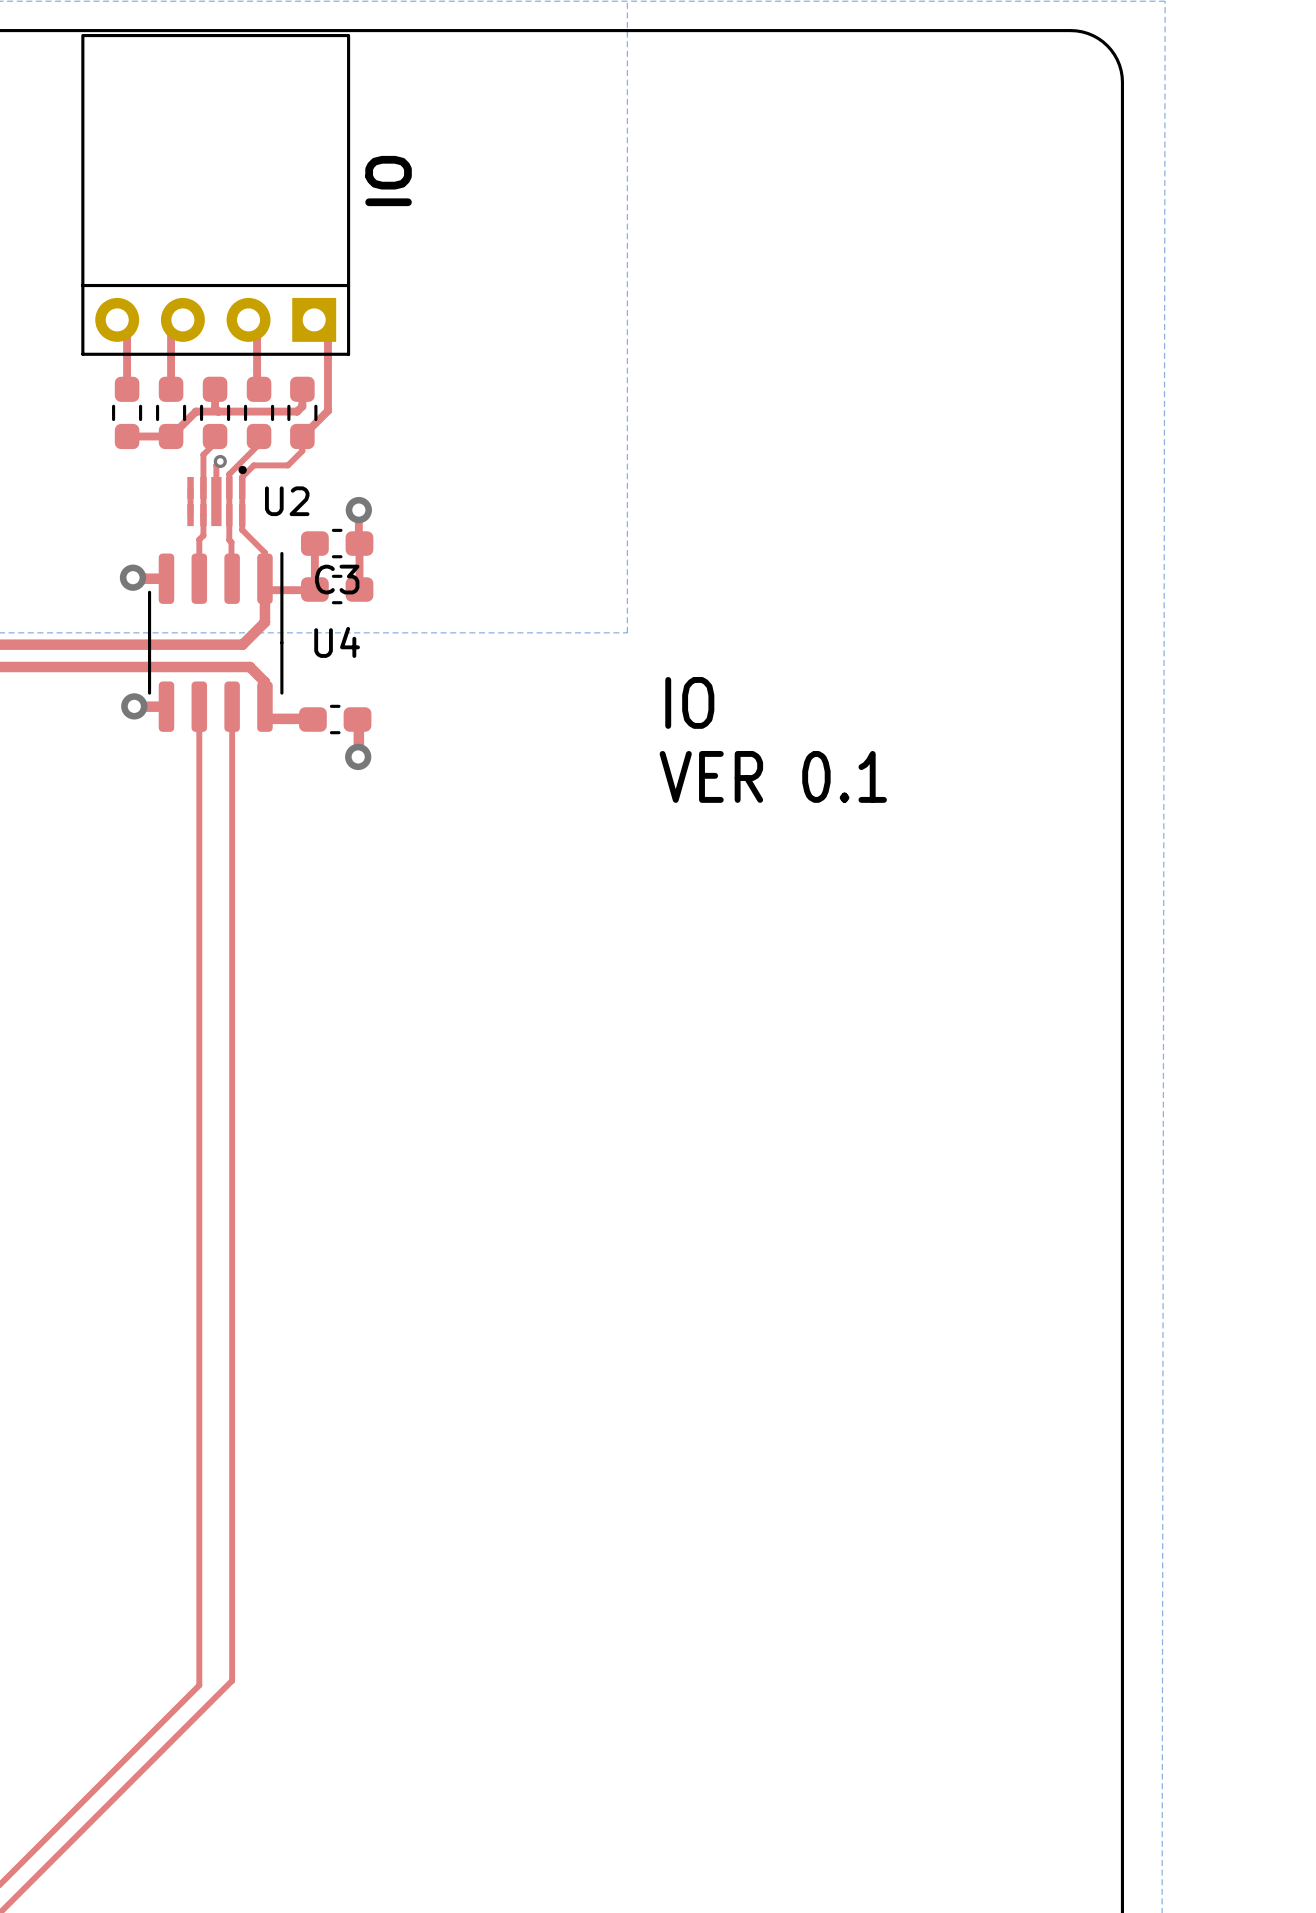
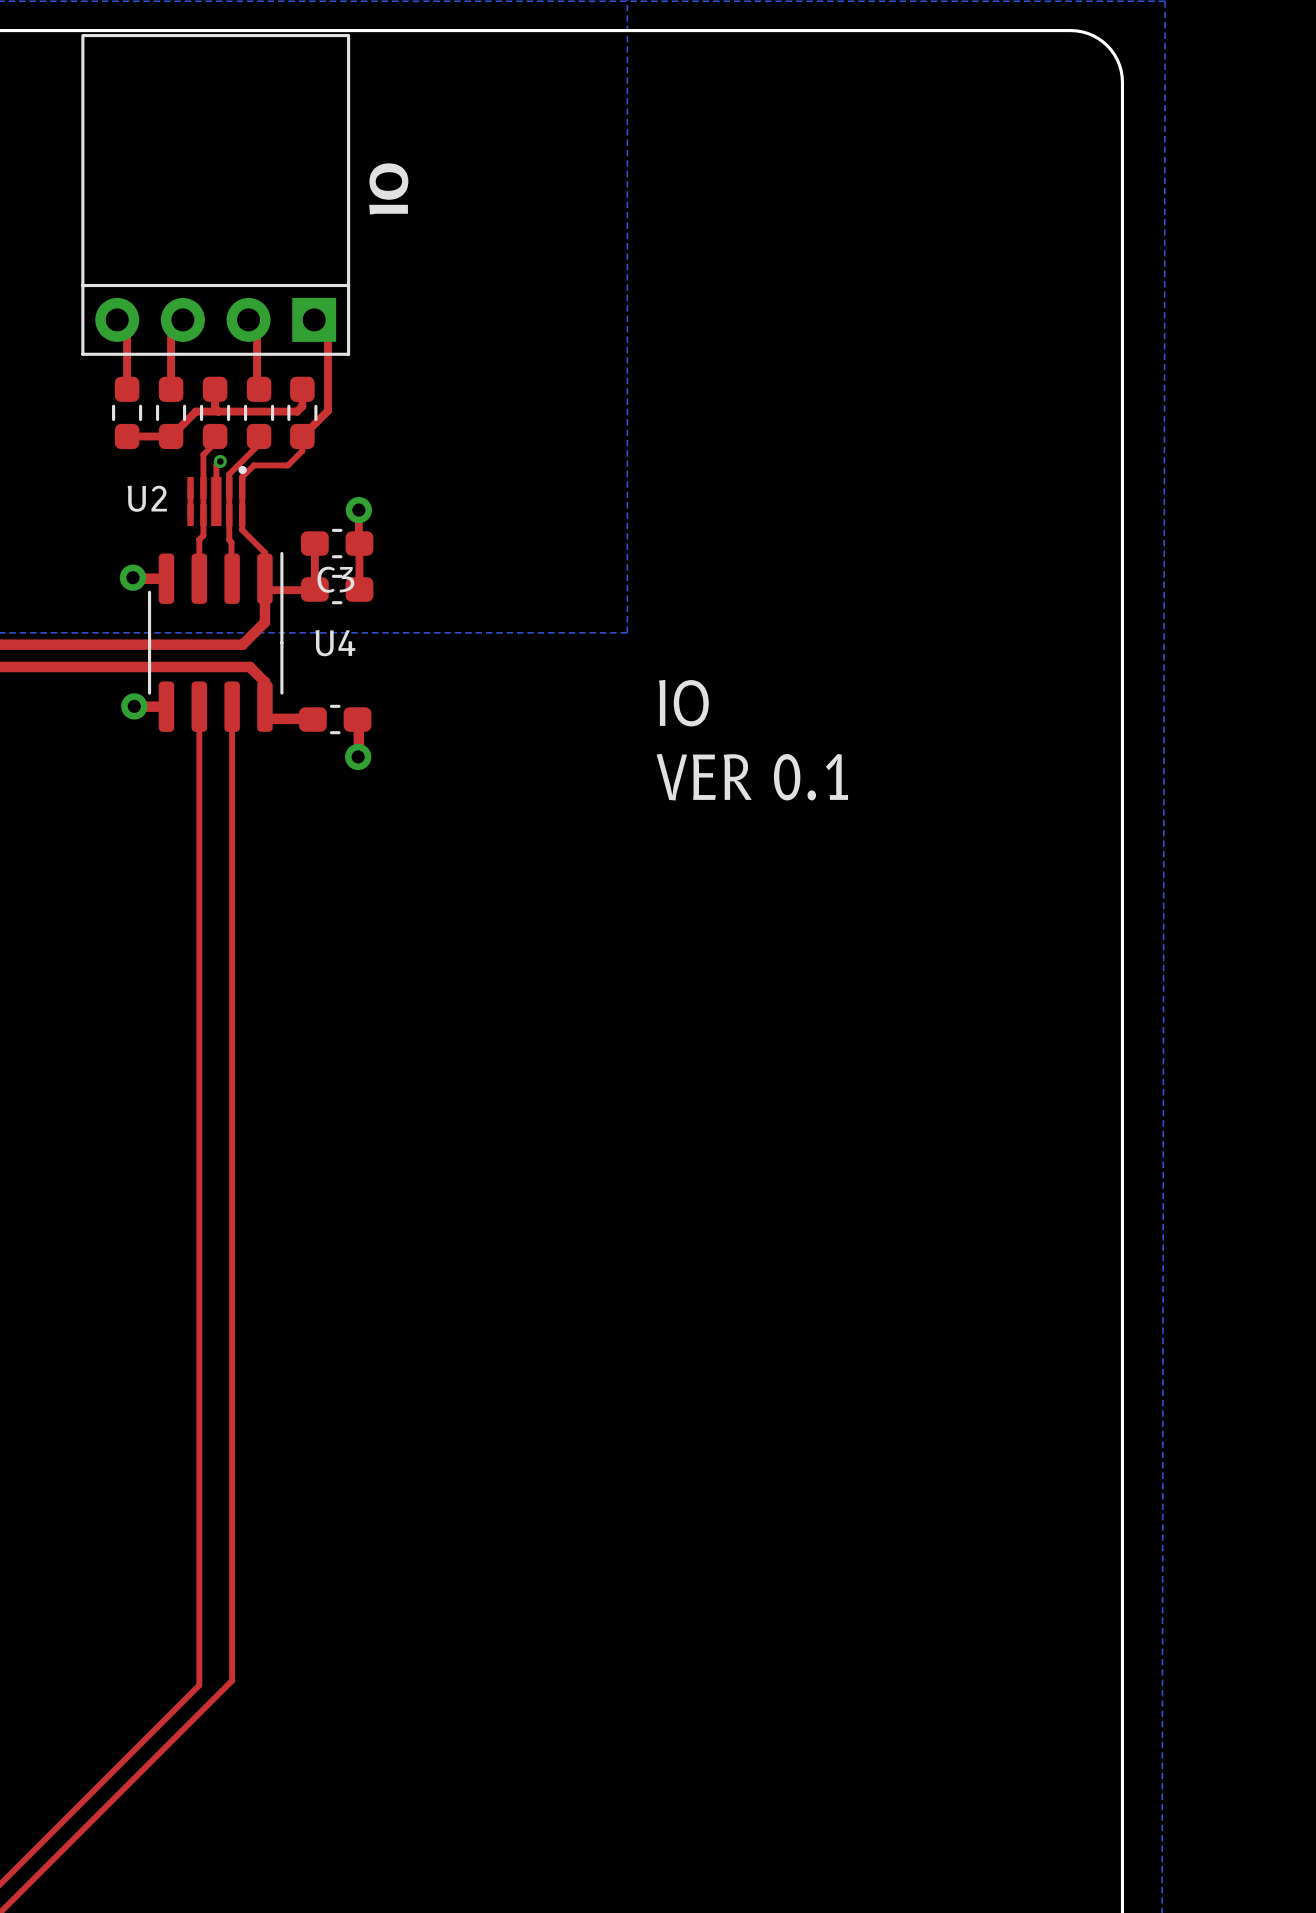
U2 name position: U2 (287, 501) -> U2 (147, 498)

